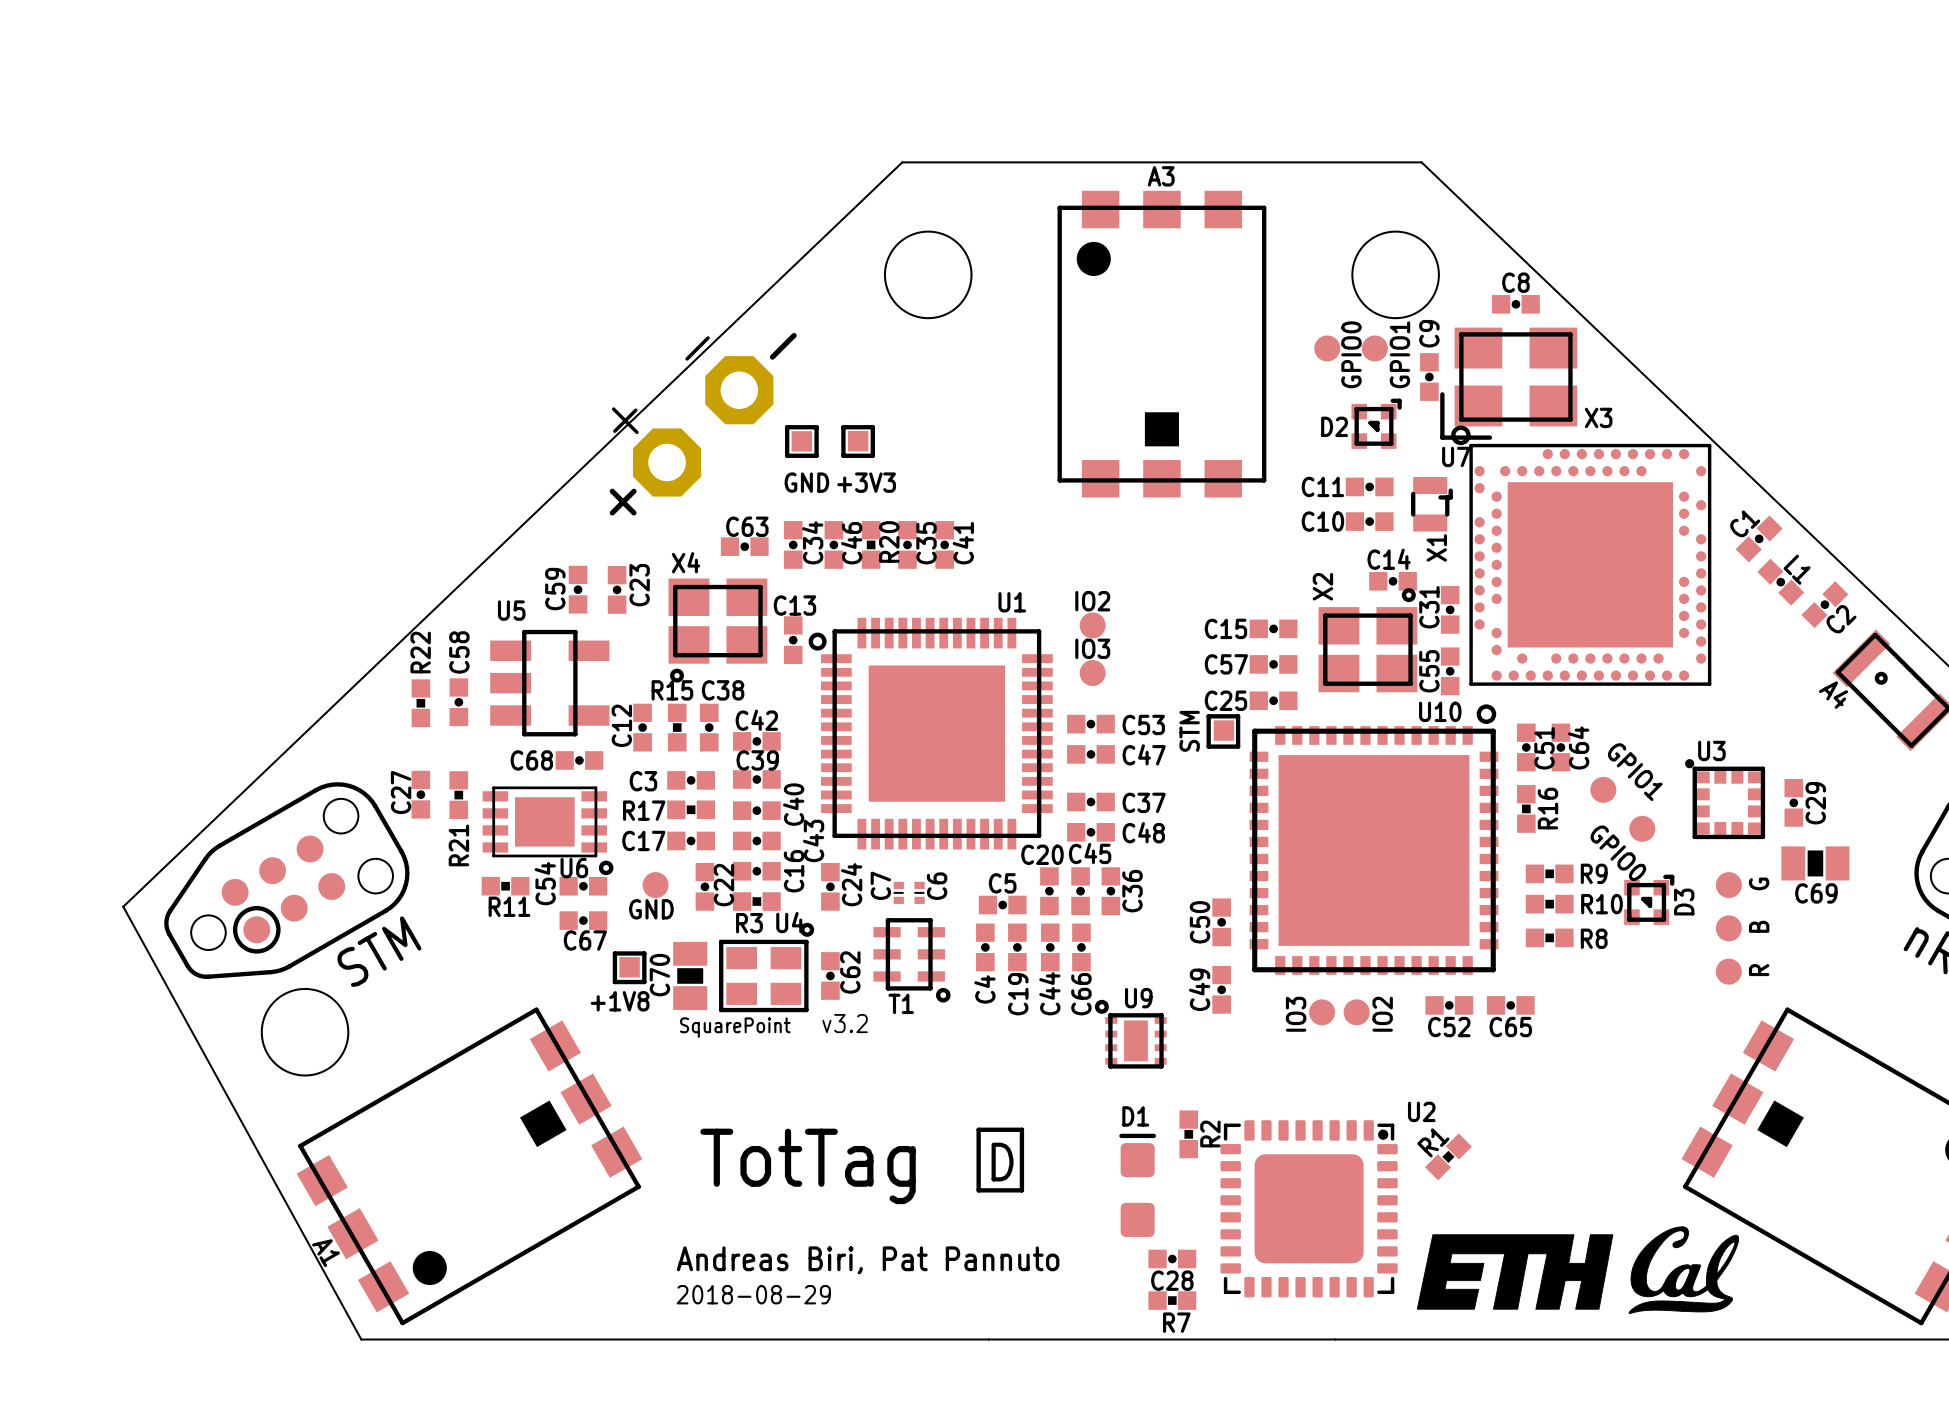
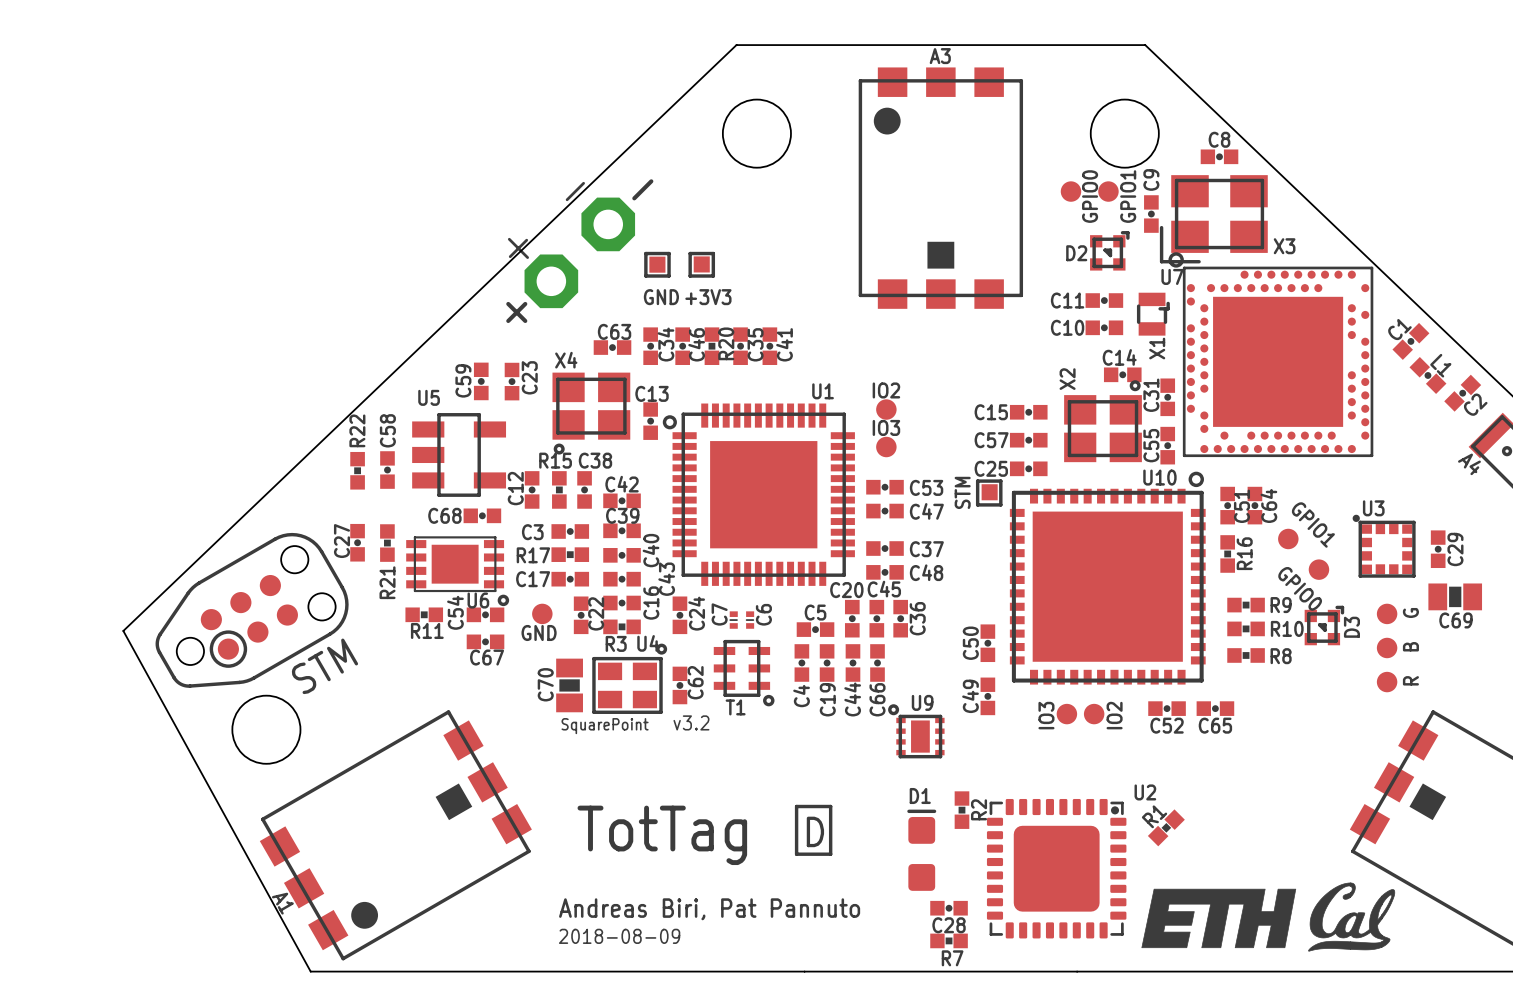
line: (614, 953) (644, 953) (644, 982) (614, 982) (614, 953) -> none
+1V8: (629, 967) -> none
text: 2018-08-29 (753, 1294) -> 2018-08-09 (619, 936)

